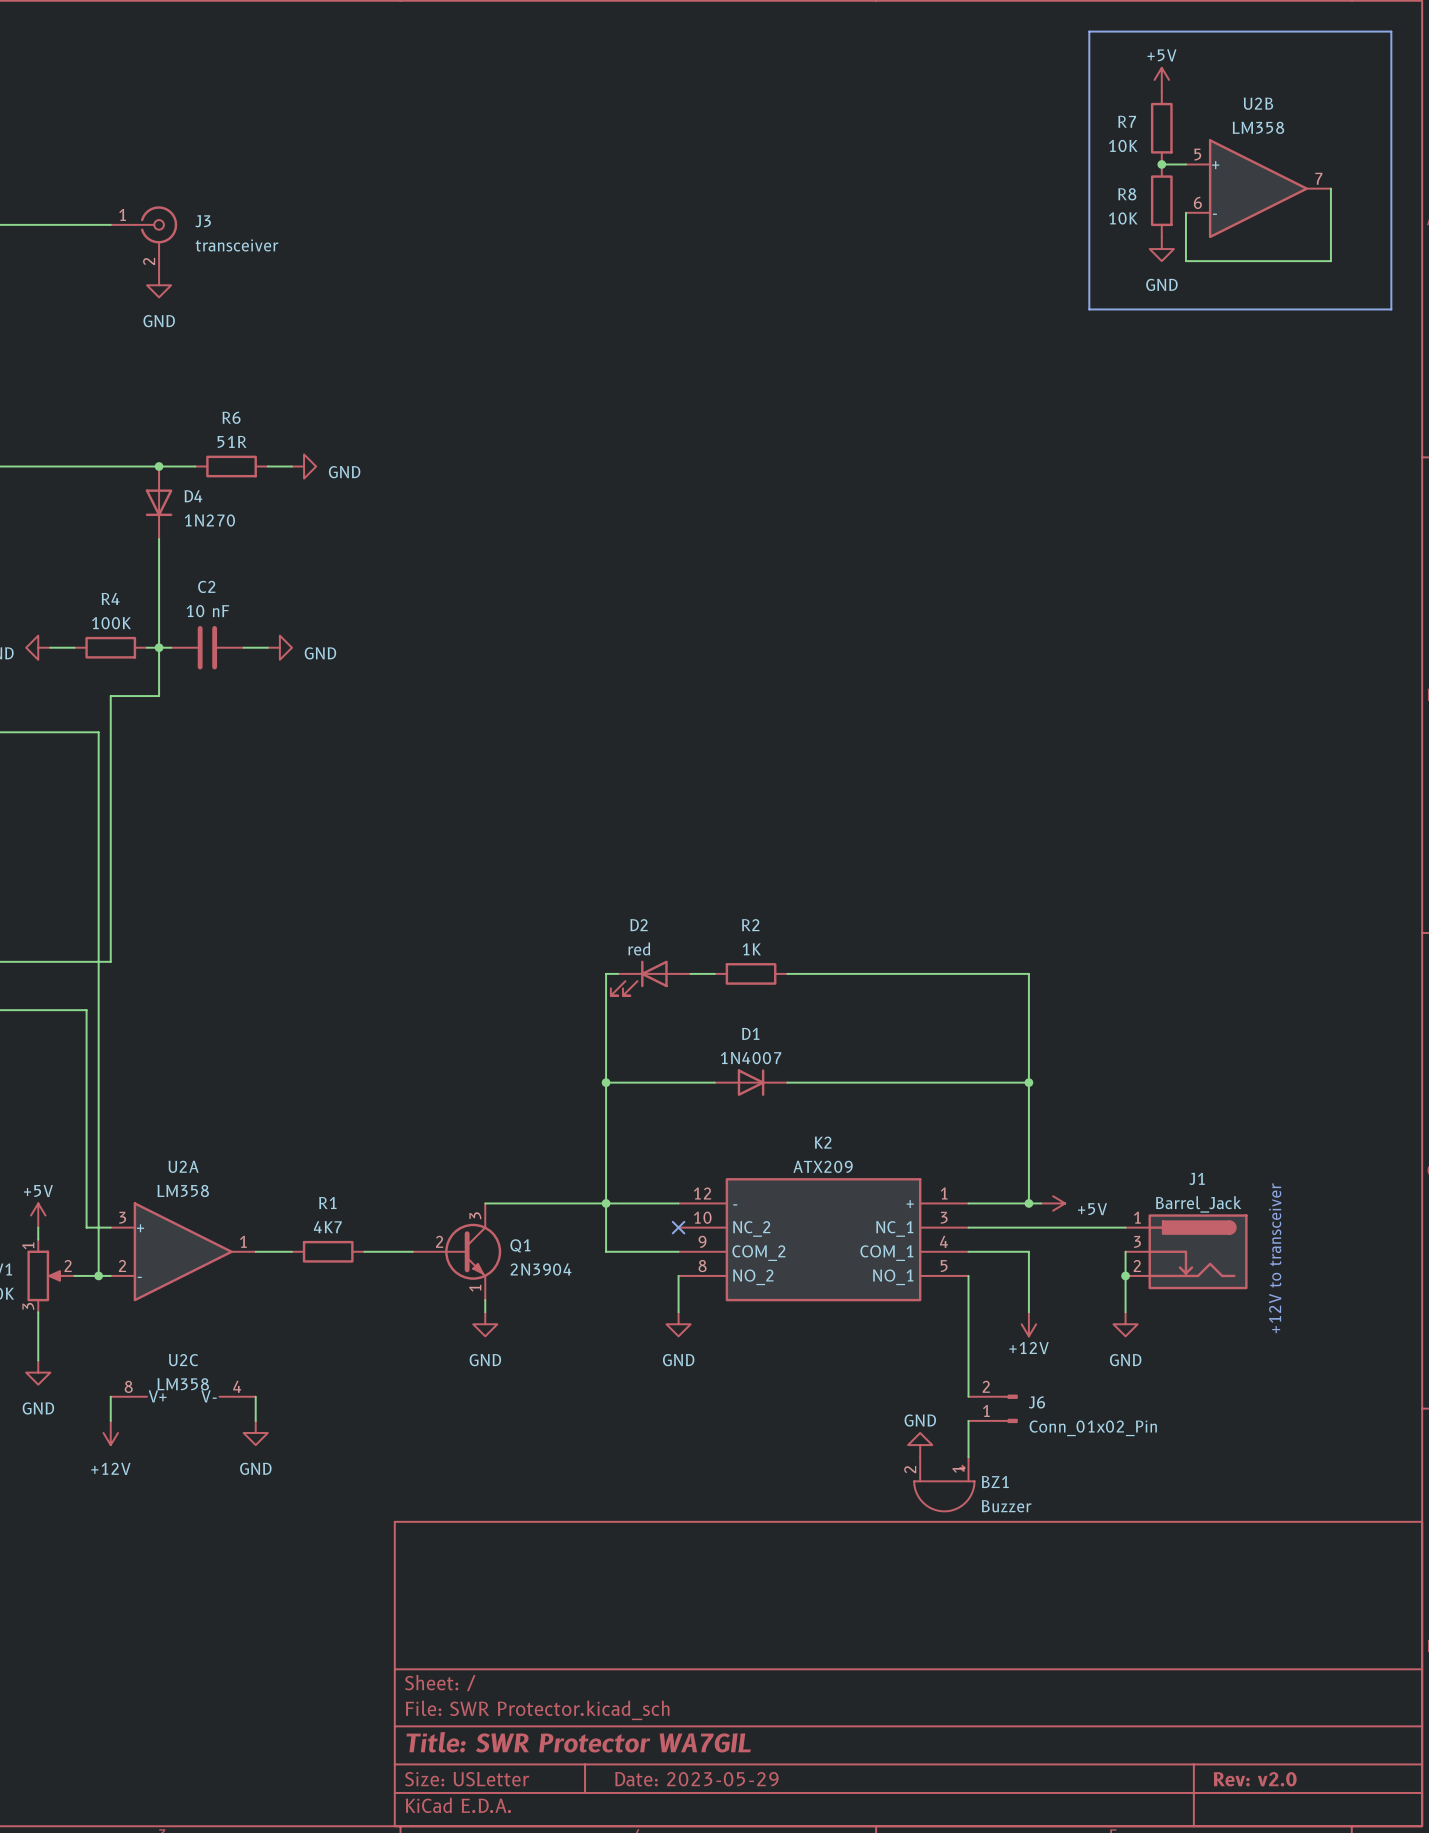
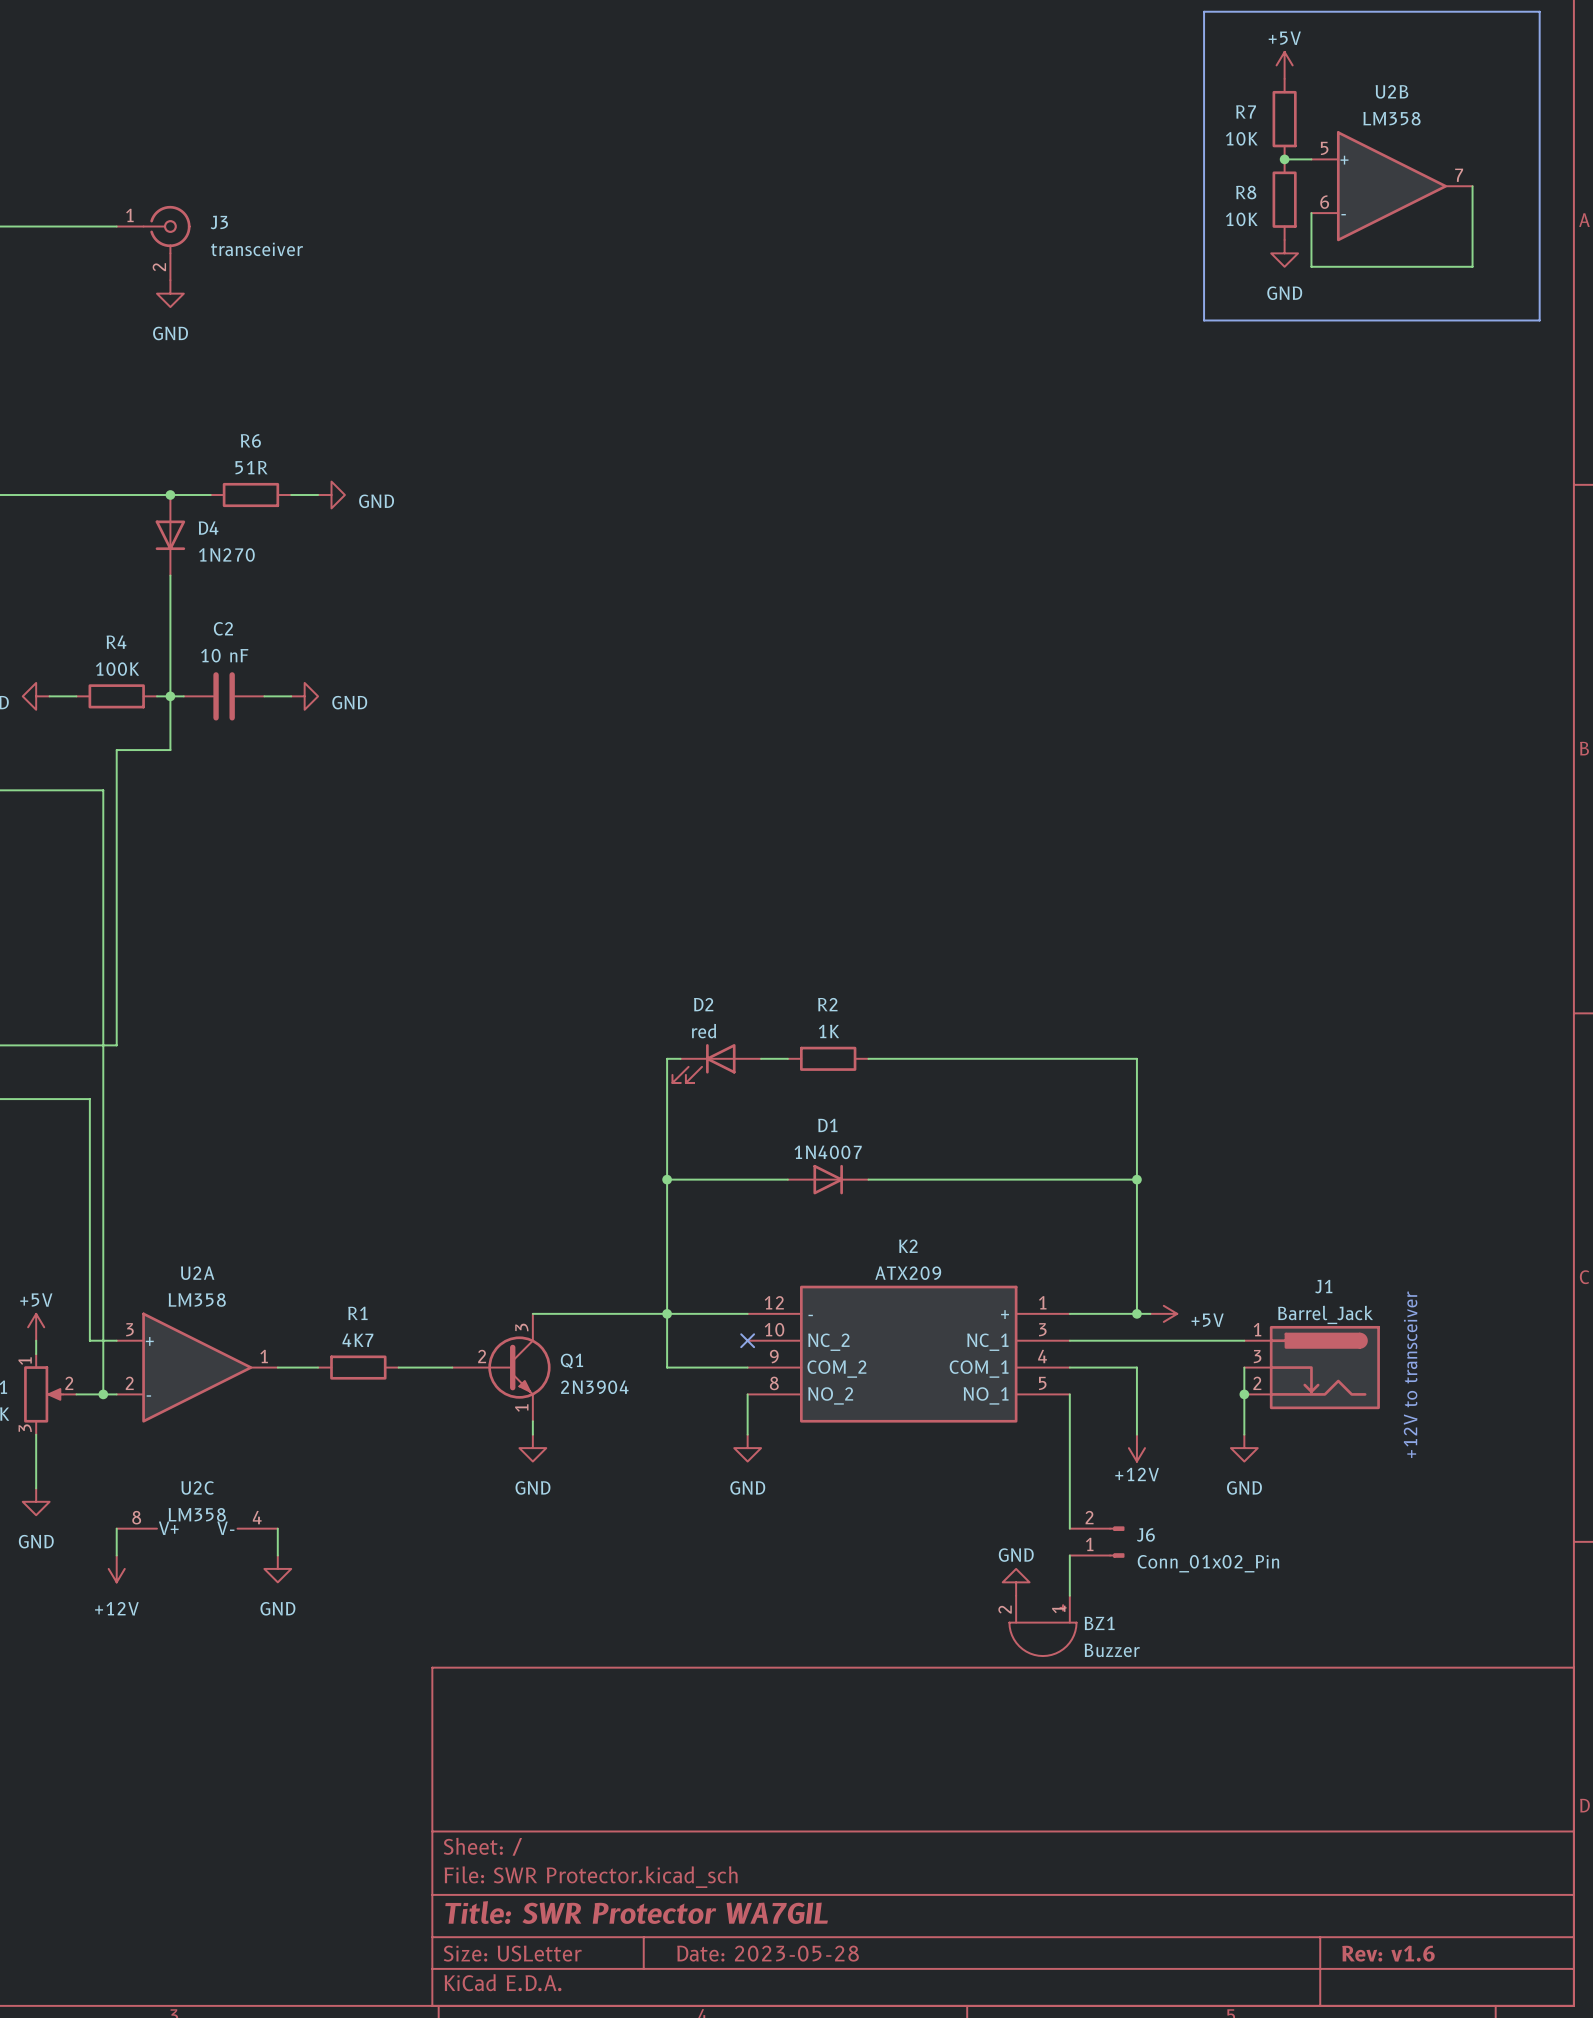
title block: Date: 2023-05-29 (696, 1779) -> Date: 2023-05-28 (768, 1953)
title block: Rev: v2.0 (1255, 1779) -> Rev: v1.6 (1388, 1953)

